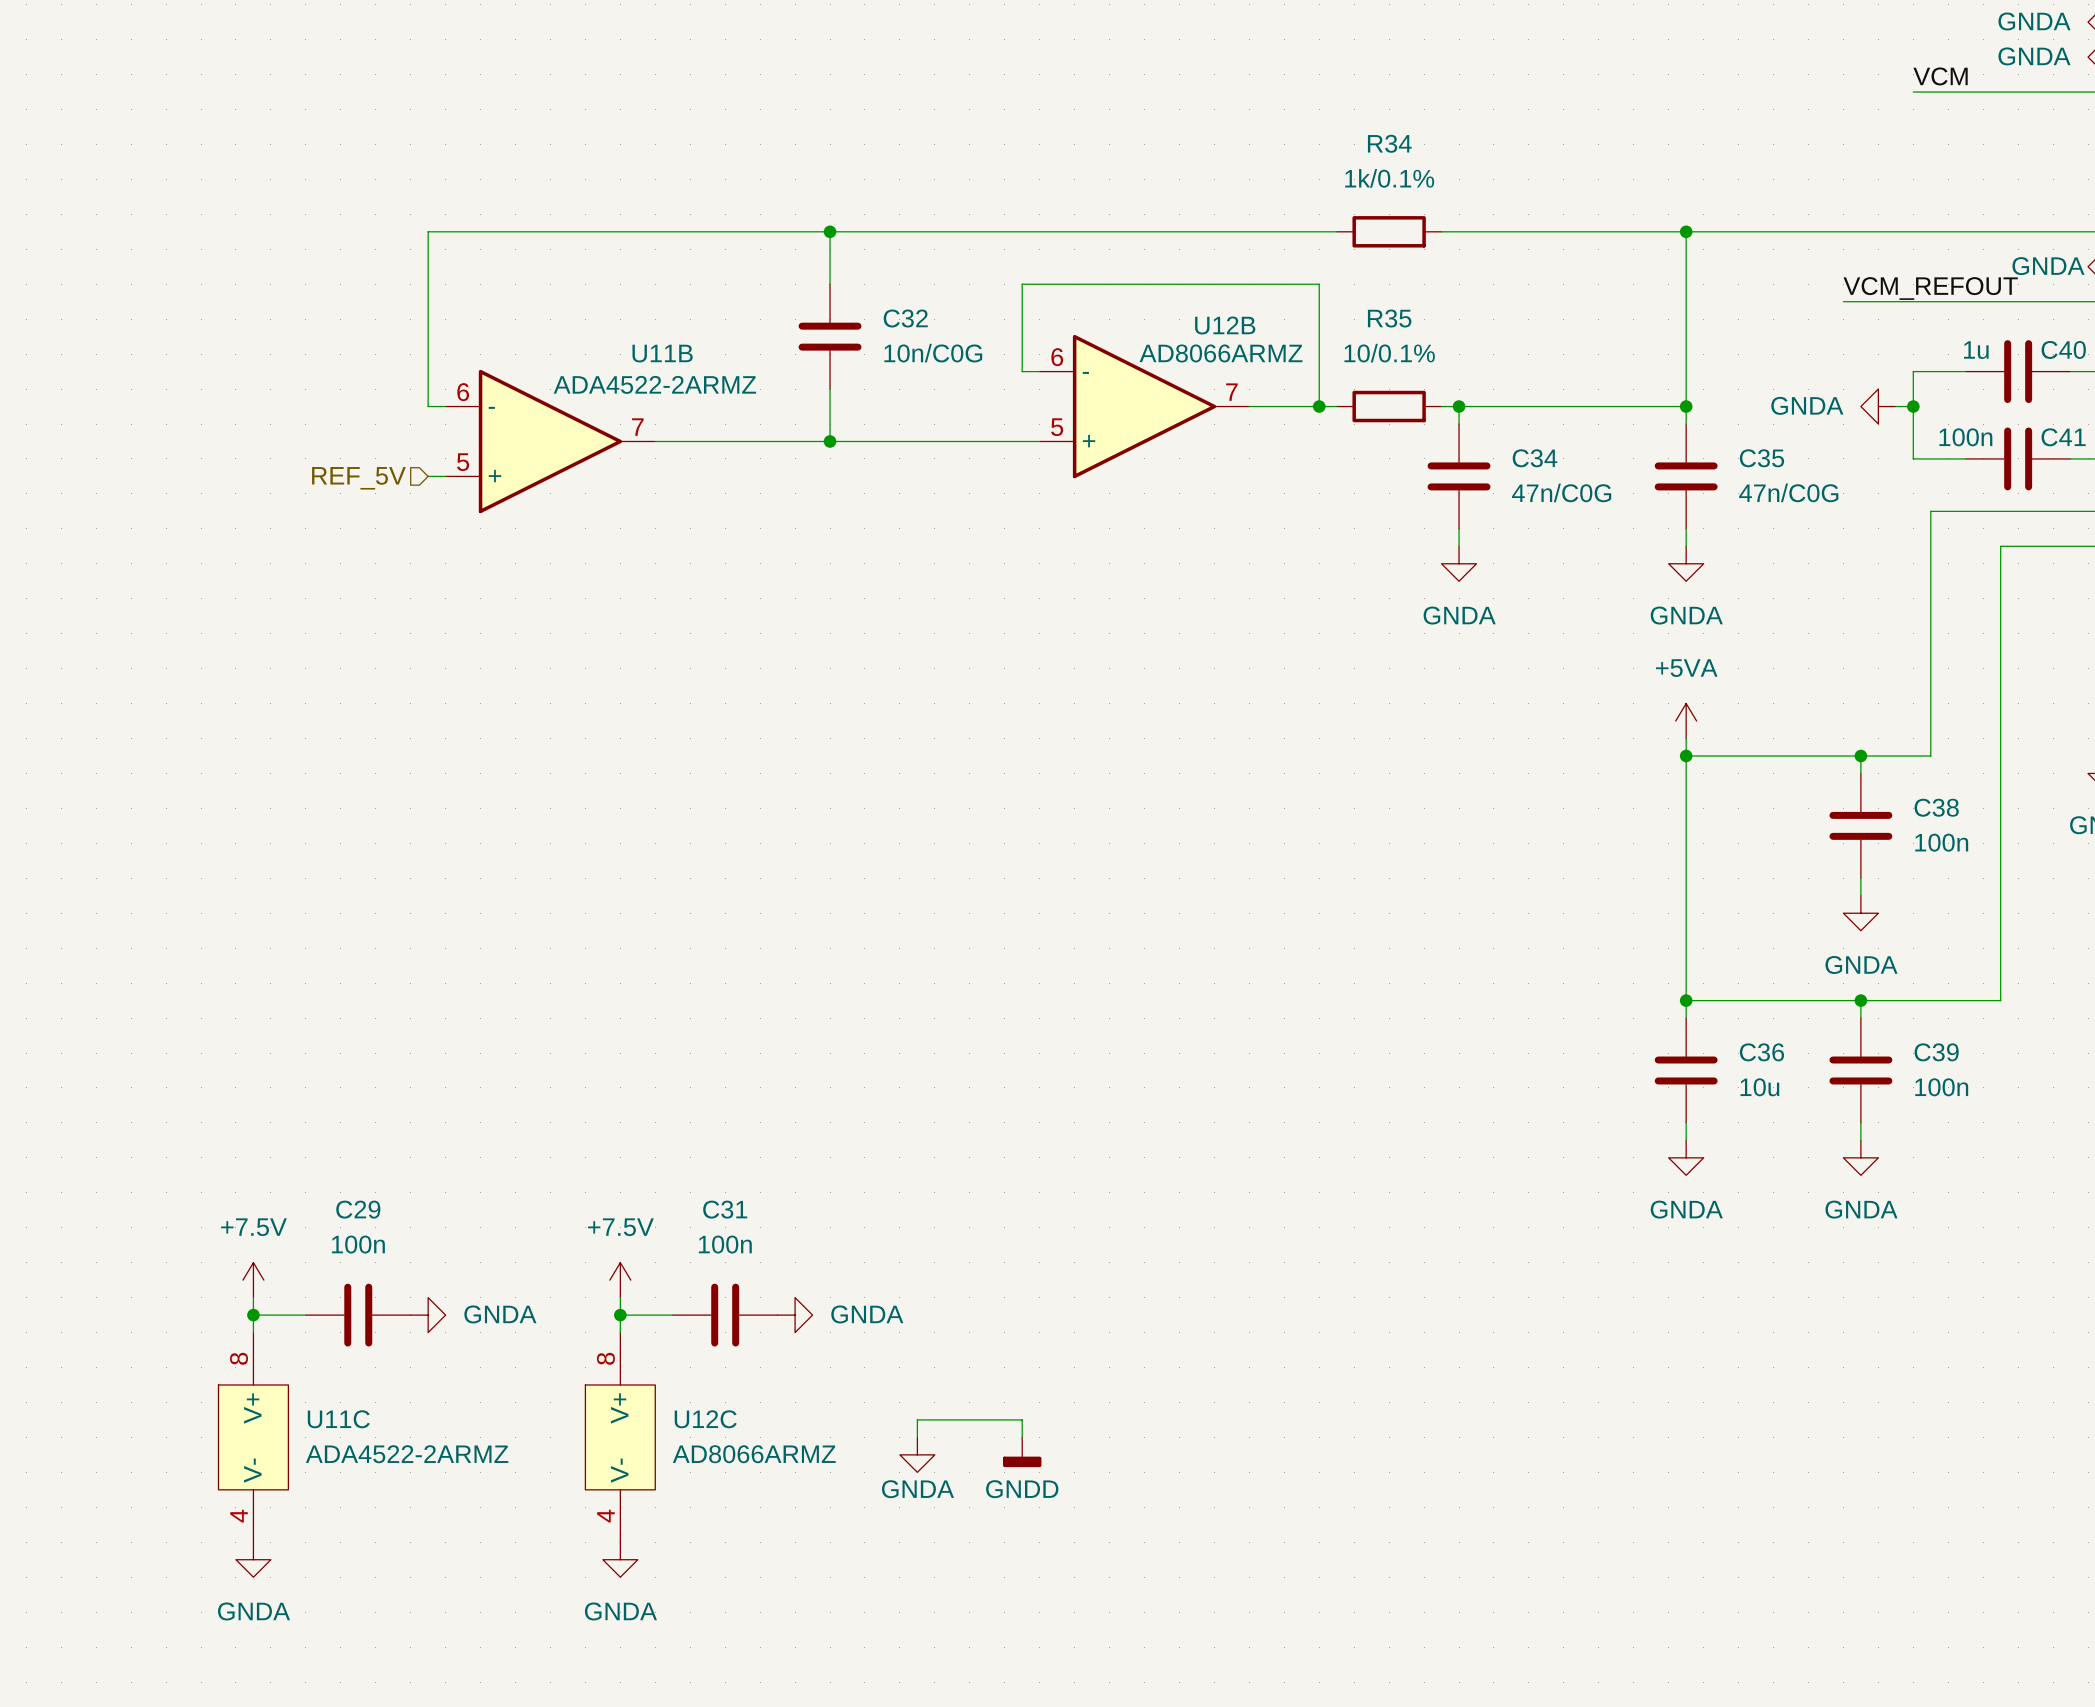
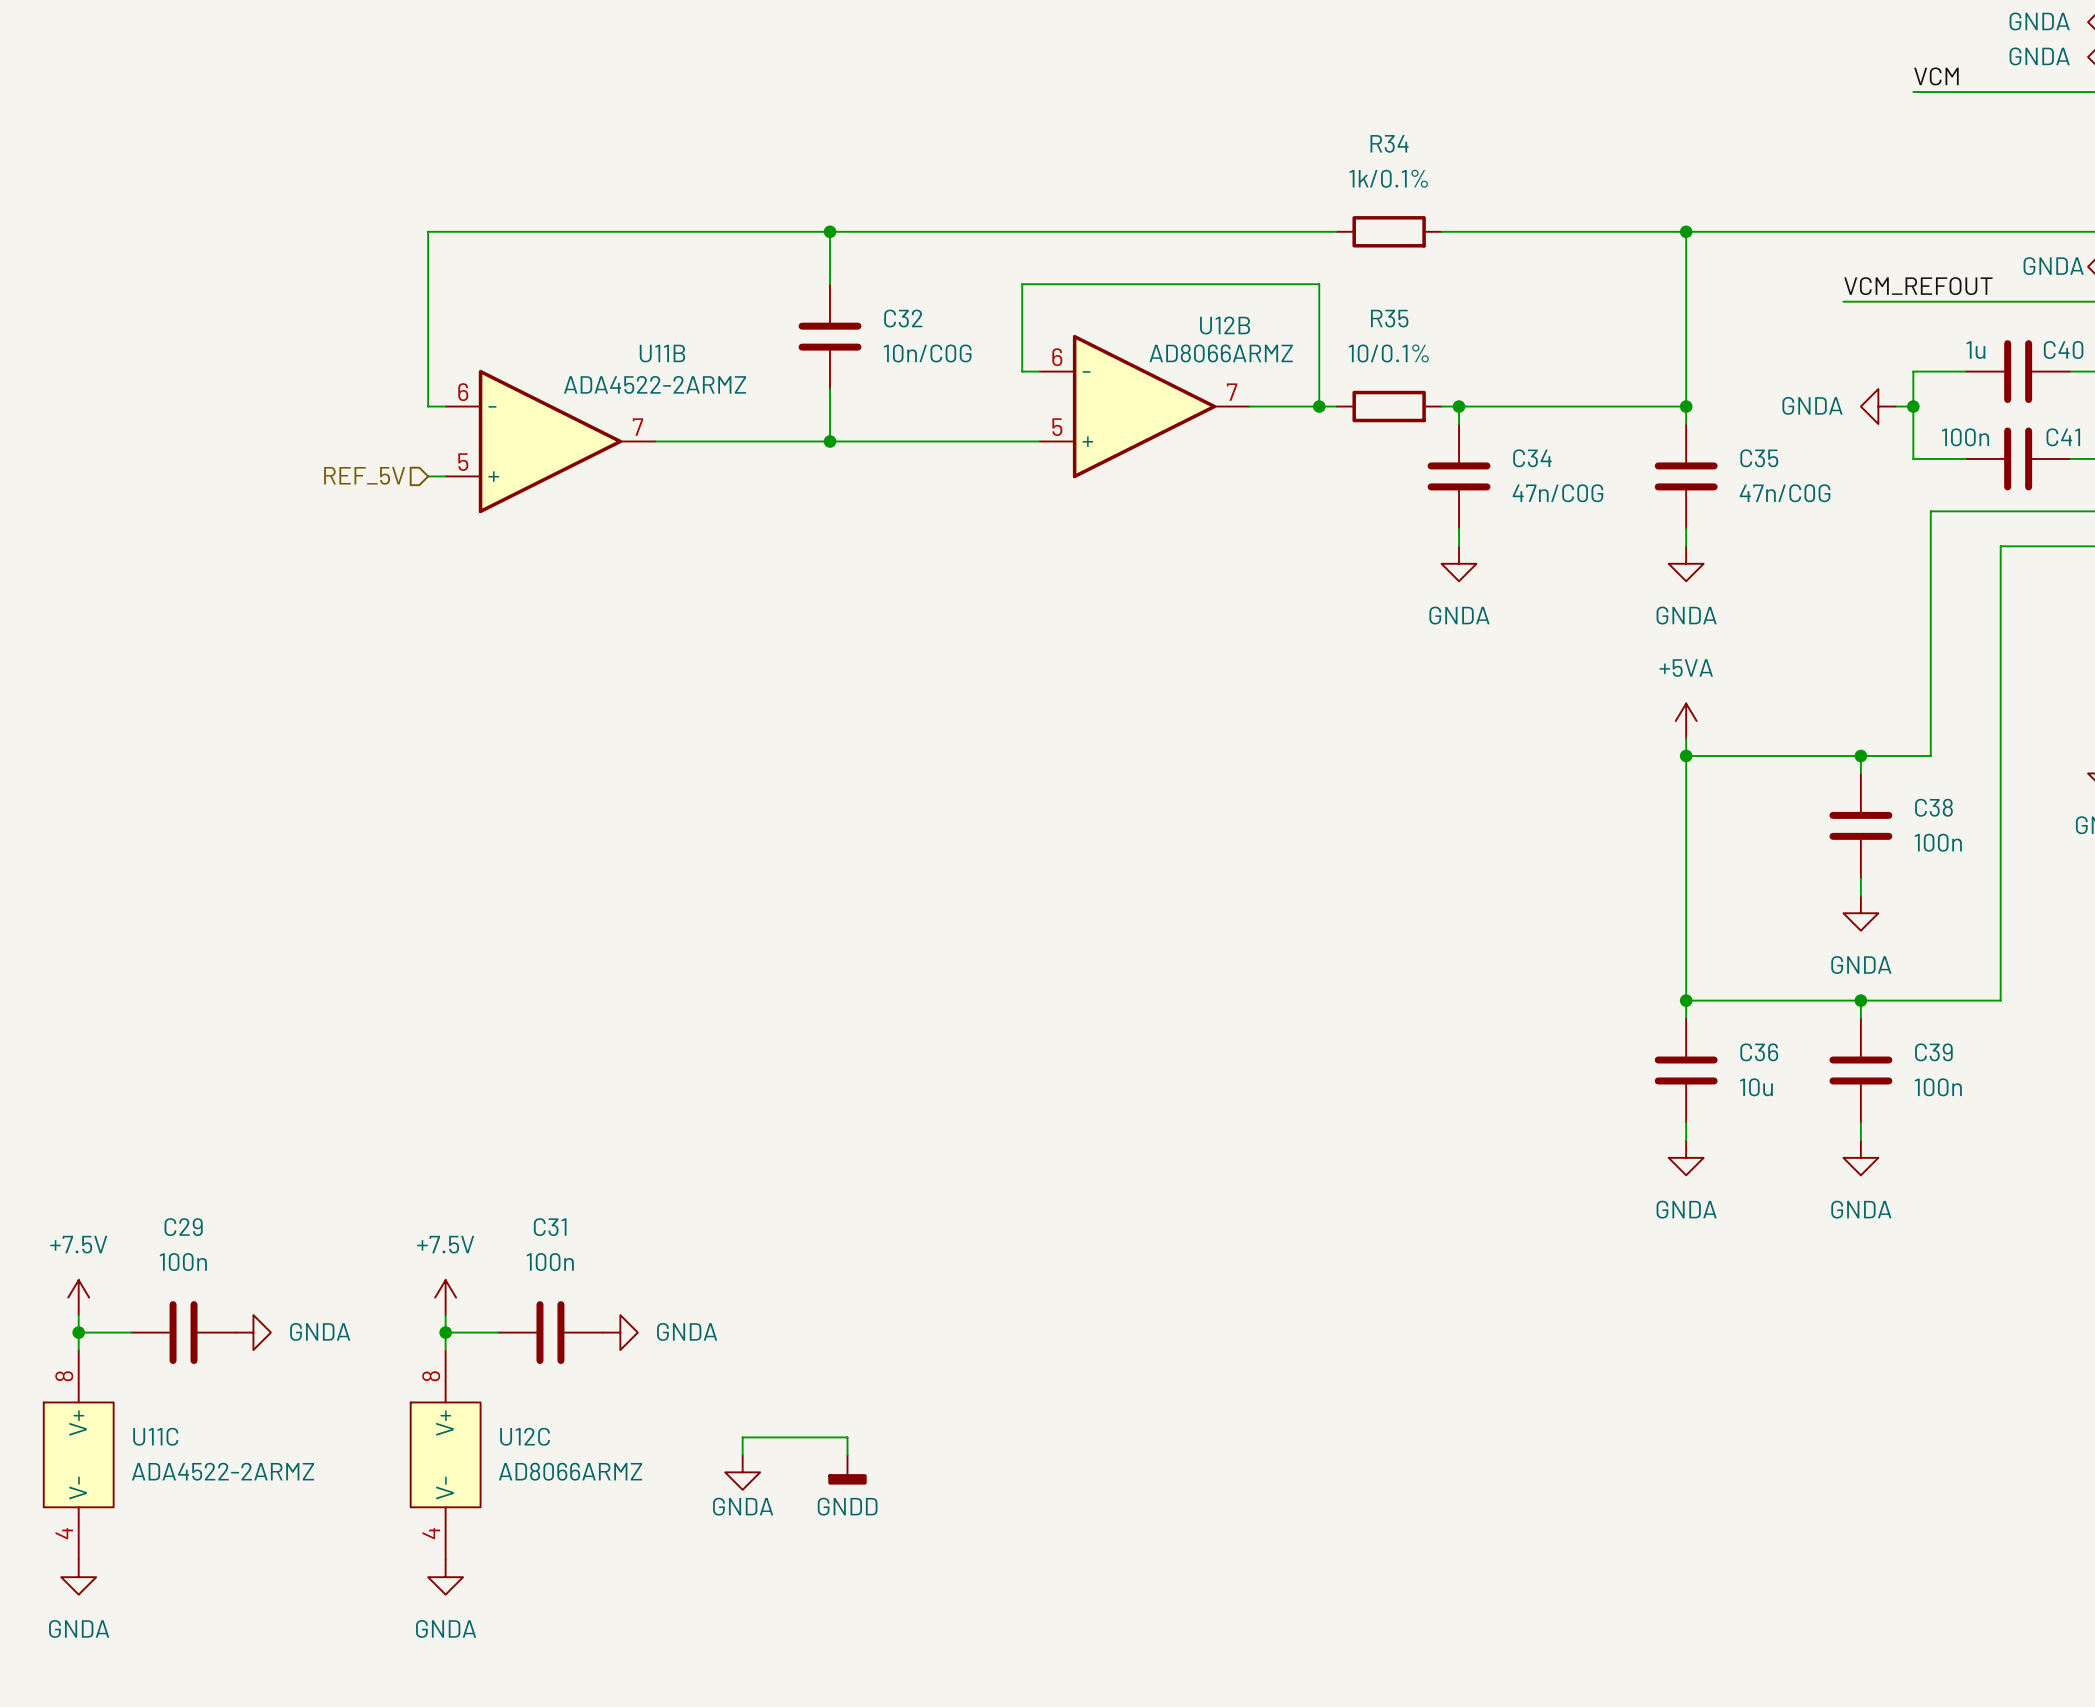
power symbol: +7.5V (253, 1280) -> none
power symbol: +7.5V (620, 1280) -> none
power symbol: none -> +7.5V (78, 1297)
wire: (253, 1297) (253, 1332) -> (78, 1315) (78, 1350)
power symbol: none -> +7.5V (445, 1297)
wire: (620, 1297) (620, 1332) -> (445, 1315) (445, 1350)
wire: (253, 1315) (305, 1315) -> (78, 1332) (131, 1332)
junction: (253, 1315) -> none
C29 position: (358, 1315) -> (183, 1332)
power symbol: GNDA (428, 1315) -> none
wire: (620, 1315) (672, 1315) -> (445, 1332) (498, 1332)
junction: (620, 1315) -> none
C31 position: (725, 1315) -> (550, 1332)
power symbol: GNDA (795, 1315) -> none
junction: none -> (78, 1332)
power symbol: none -> GNDA (253, 1332)
junction: none -> (445, 1332)
power symbol: none -> GNDA (620, 1332)
U11C position: (253, 1437) -> (78, 1454)
U12C position: (620, 1437) -> (445, 1454)
wire: (917, 1437) (917, 1419) (1022, 1419) (1022, 1437) -> (742, 1454) (742, 1437) (847, 1437) (847, 1454)
power symbol position: GNDD (1022, 1452) -> GNDD (847, 1469)
power symbol: GNDA (917, 1454) -> none
power symbol: none -> GNDA (742, 1472)
power symbol: GNDA (253, 1559) -> none
power symbol: GNDA (620, 1559) -> none
power symbol: none -> GNDA (78, 1577)
power symbol: none -> GNDA (445, 1577)

